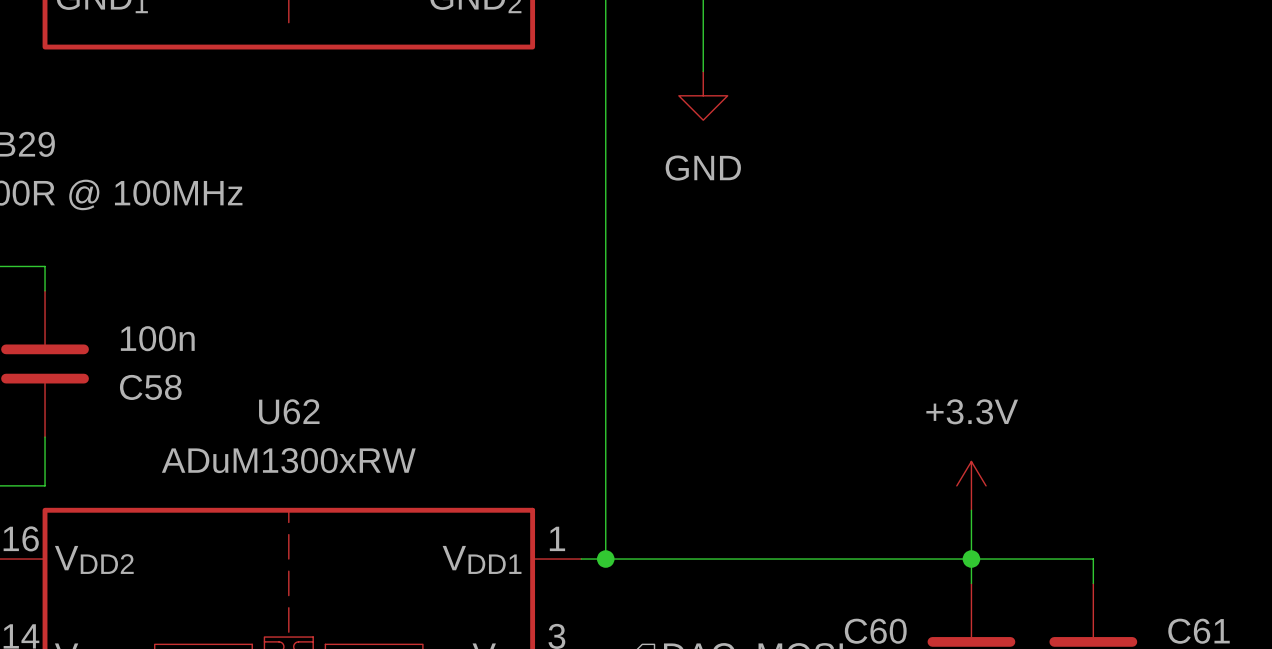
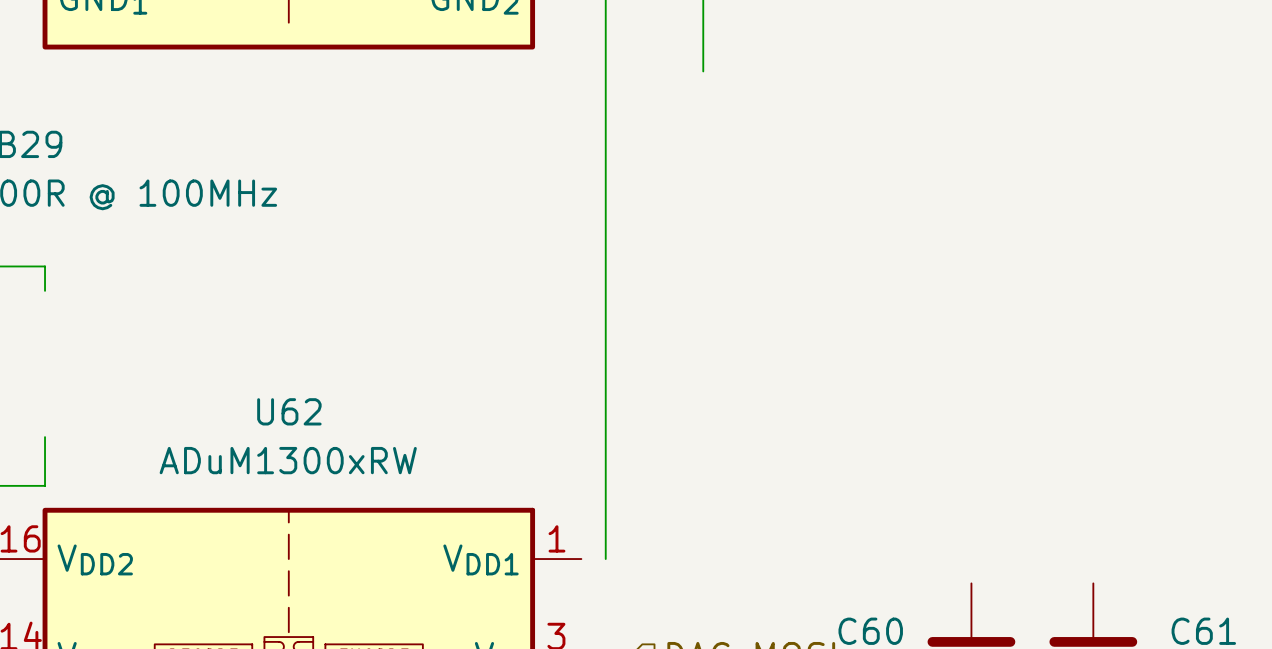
power symbol: GND (703, 95) -> none
C58: 100n (45, 363) -> none
power symbol: +3.3V (971, 485) -> none
wire: (971, 510) (971, 583) -> none
wire: (581, 559) (1093, 559) (1093, 583) -> none
junction: (605, 559) -> none
junction: (971, 559) -> none

